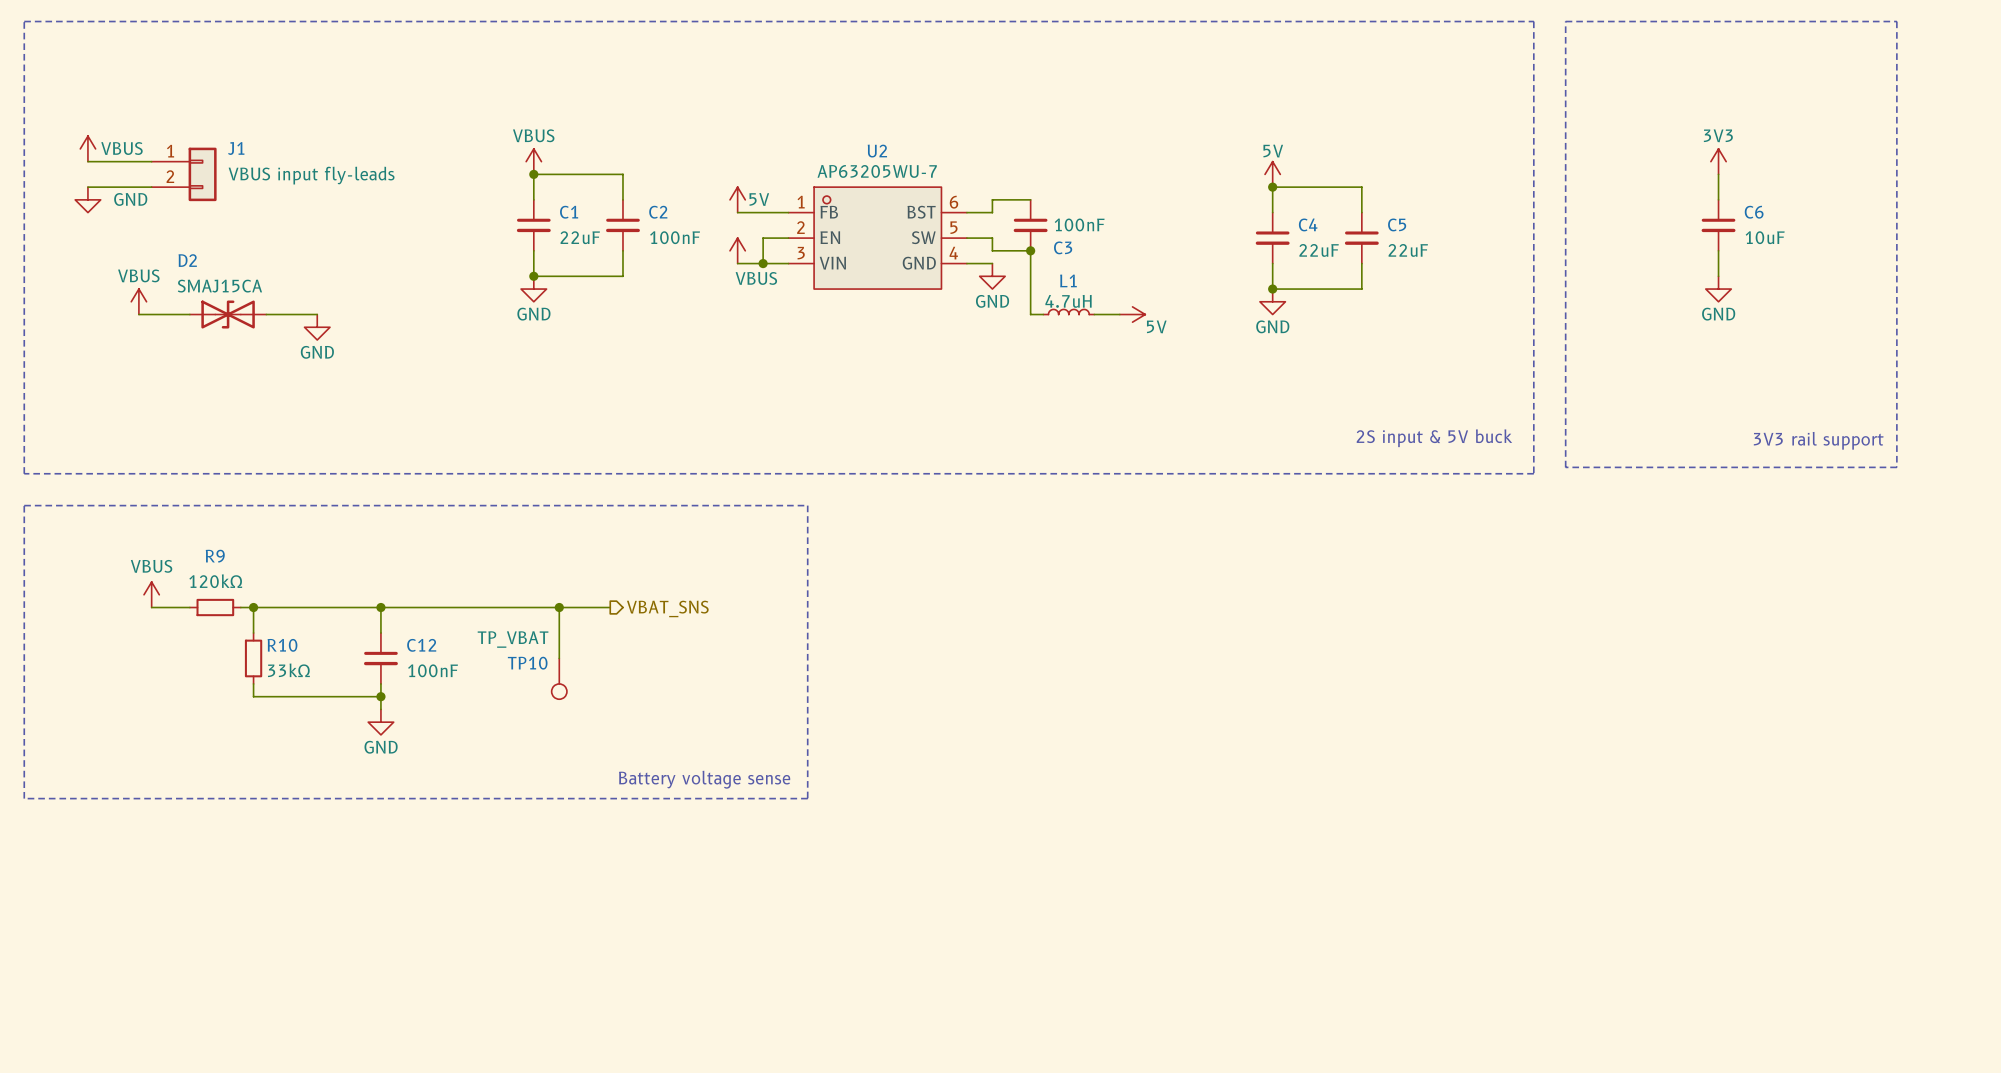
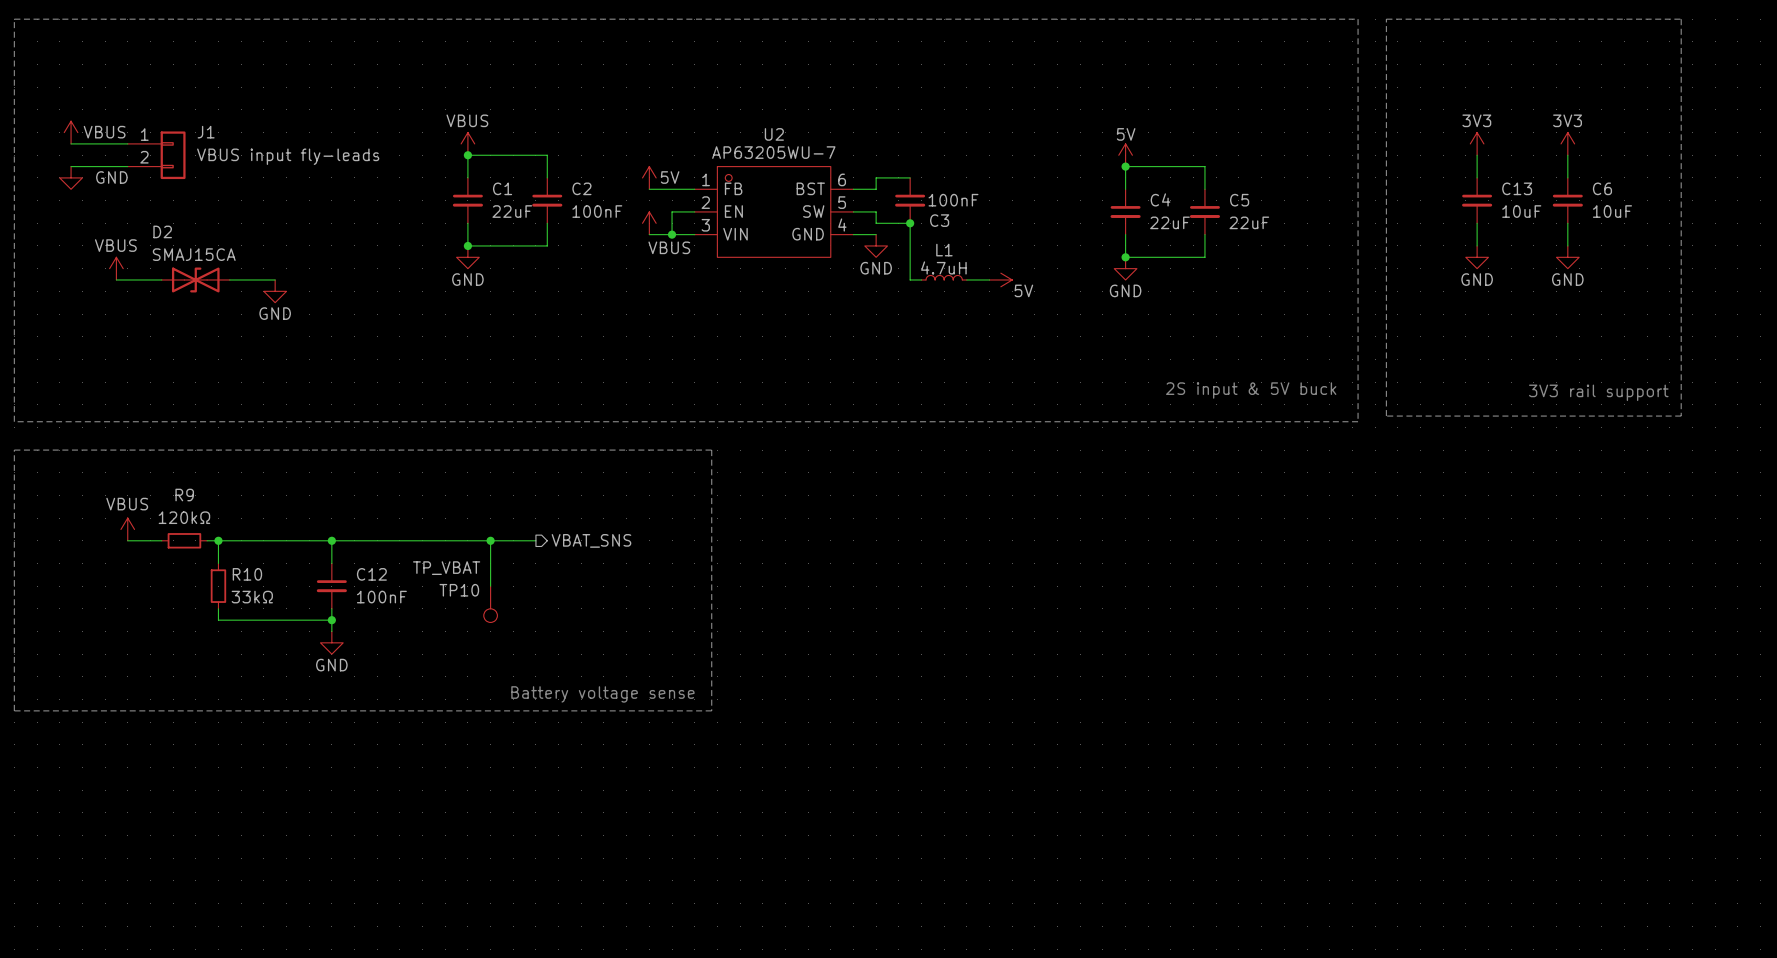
power symbol: none -> 3V3 (1477, 143)
power symbol: 3V3 (1718, 161) -> none
power symbol: none -> 3V3 (1567, 143)
wire: none -> (1477, 155) (1477, 177)
wire: (1718, 174) (1718, 199) -> (1567, 155) (1567, 177)
C13: none -> 10uF (1477, 200)
C6 position: (1718, 225) -> (1567, 200)
wire: none -> (1477, 223) (1477, 245)
wire: (1718, 250) (1718, 276) -> (1567, 223) (1567, 245)
power symbol: none -> GND (1477, 257)
power symbol: GND (1718, 289) -> none
power symbol: none -> GND (1567, 257)

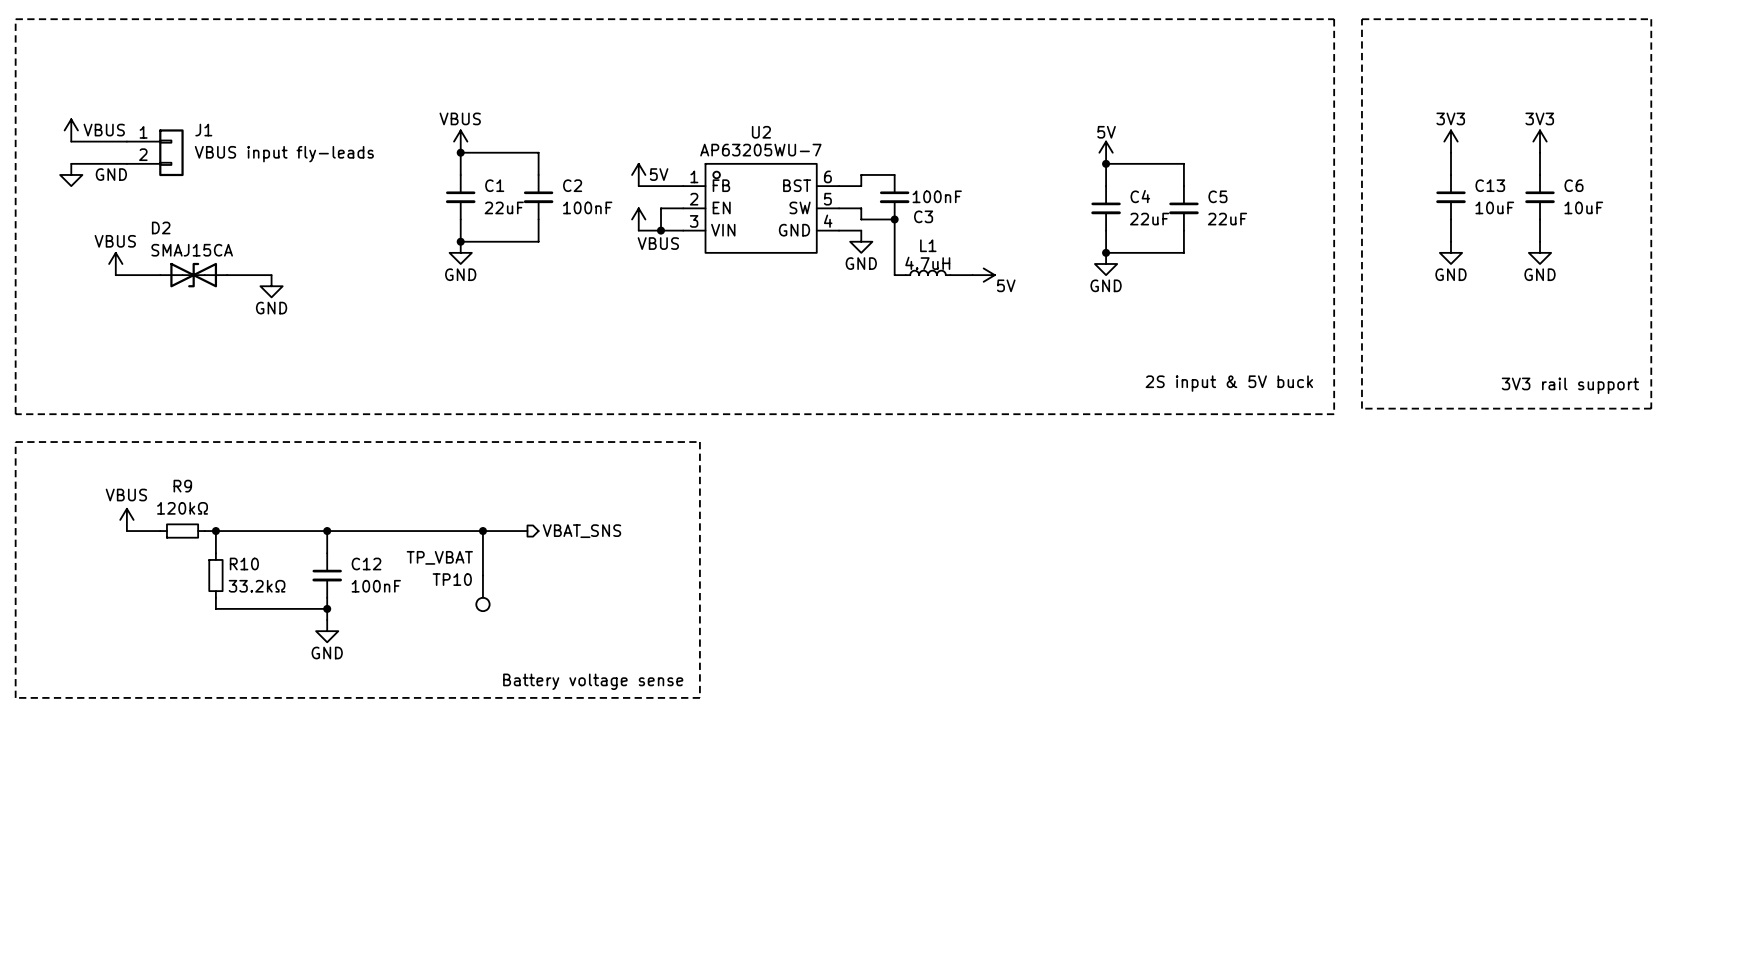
R10 value: 33kΩ (252, 597) -> 33.2kΩ (257, 586)

